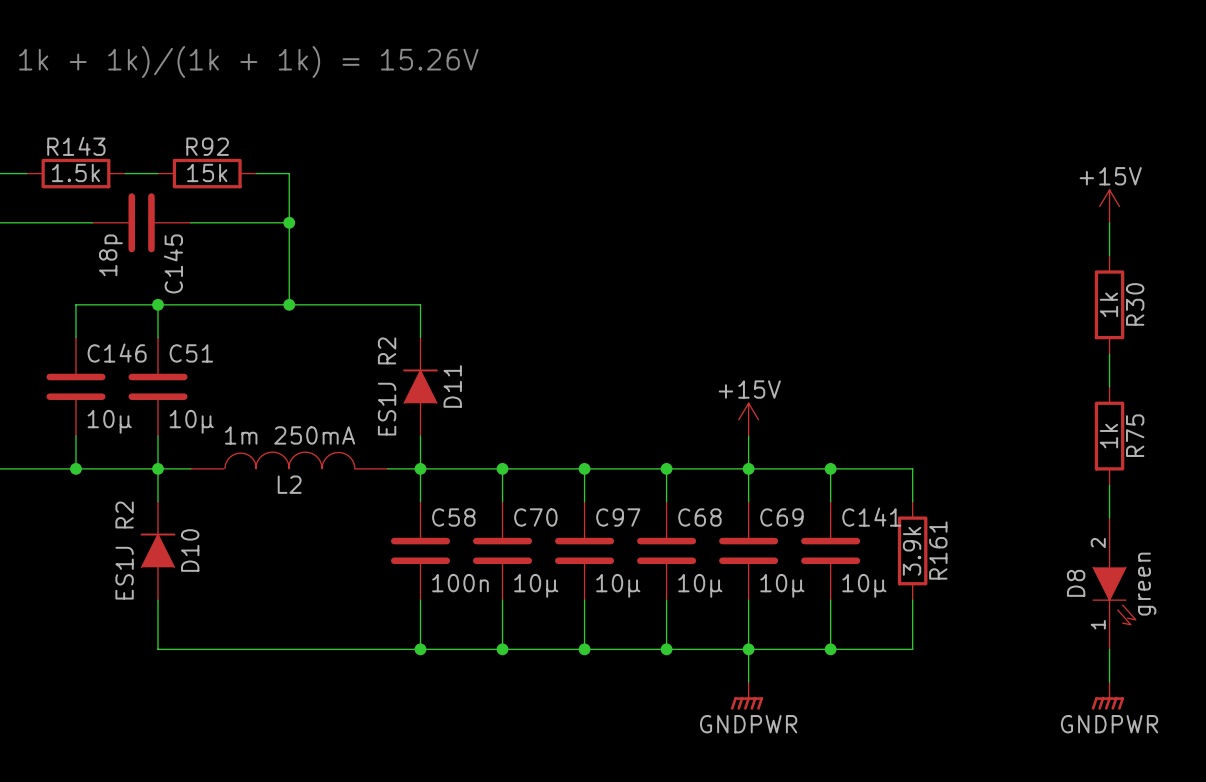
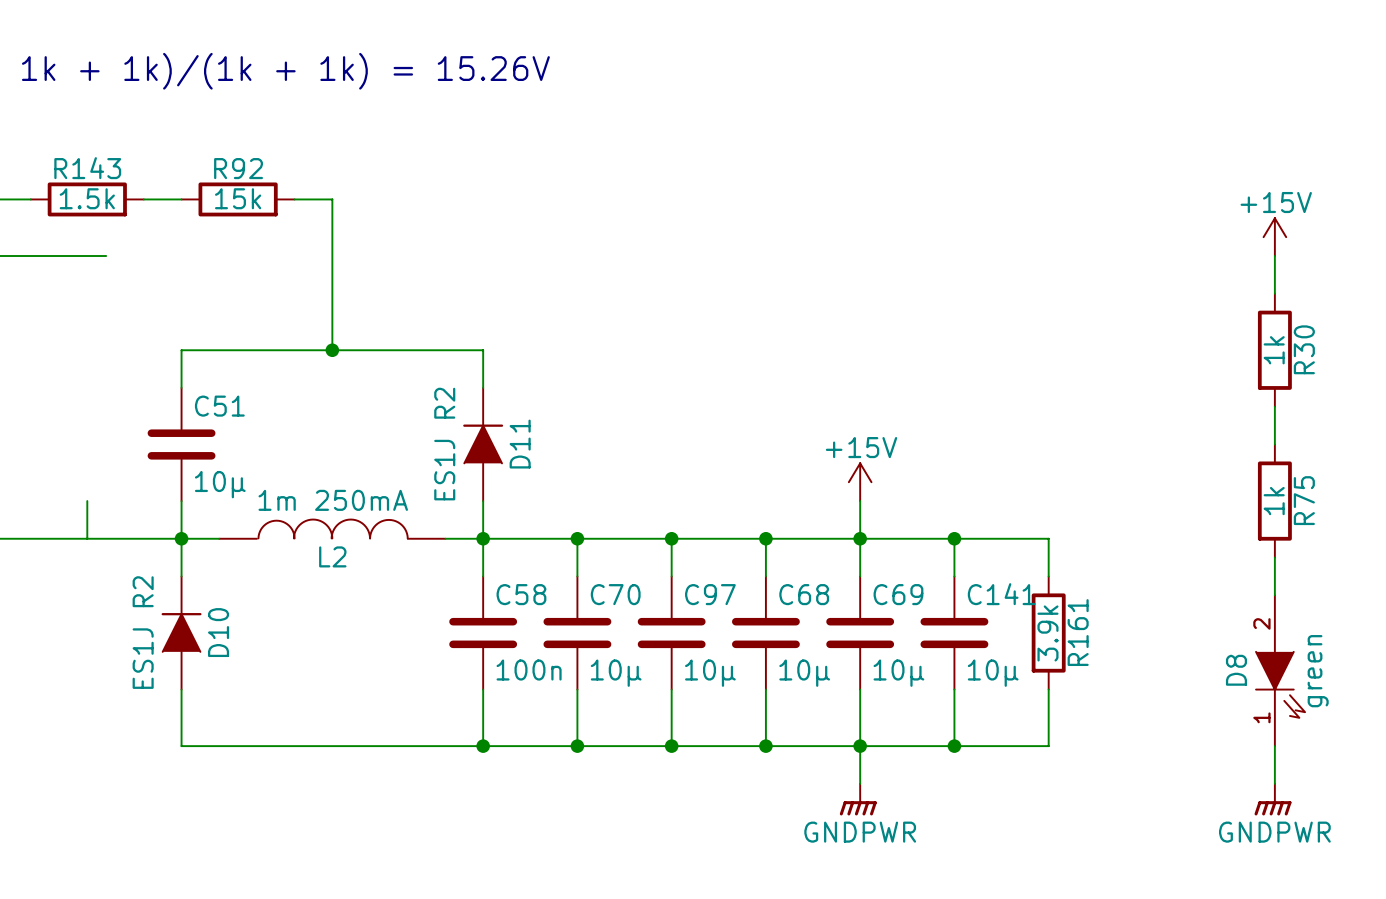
C145: 18p (141, 222) -> none
wire: (190, 222) (289, 222) -> none
junction: (289, 222) -> none
wire: (158, 304) (75, 304) (75, 337) -> none
junction: (158, 304) -> none
C146: 10µ (75, 386) -> none
junction: (75, 468) -> none

